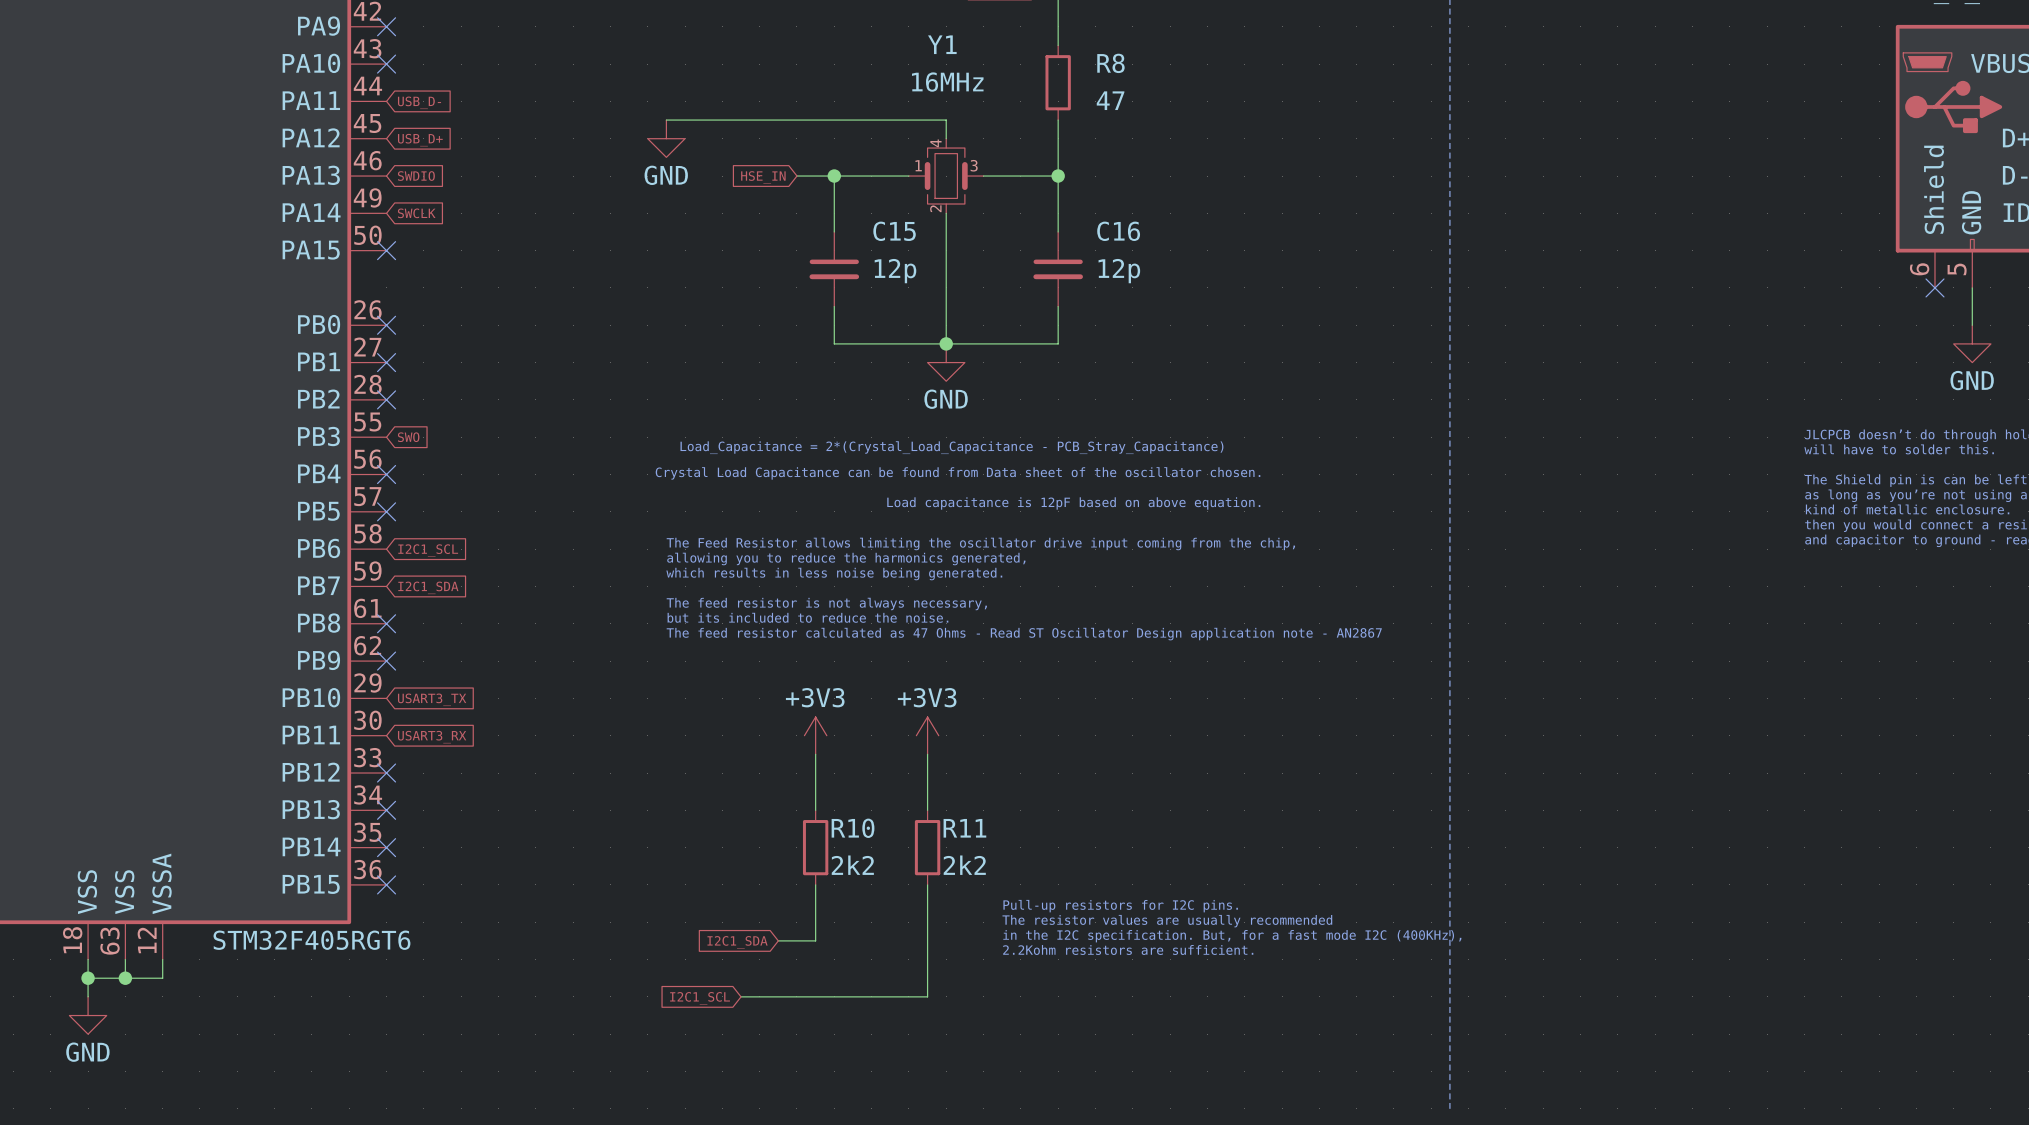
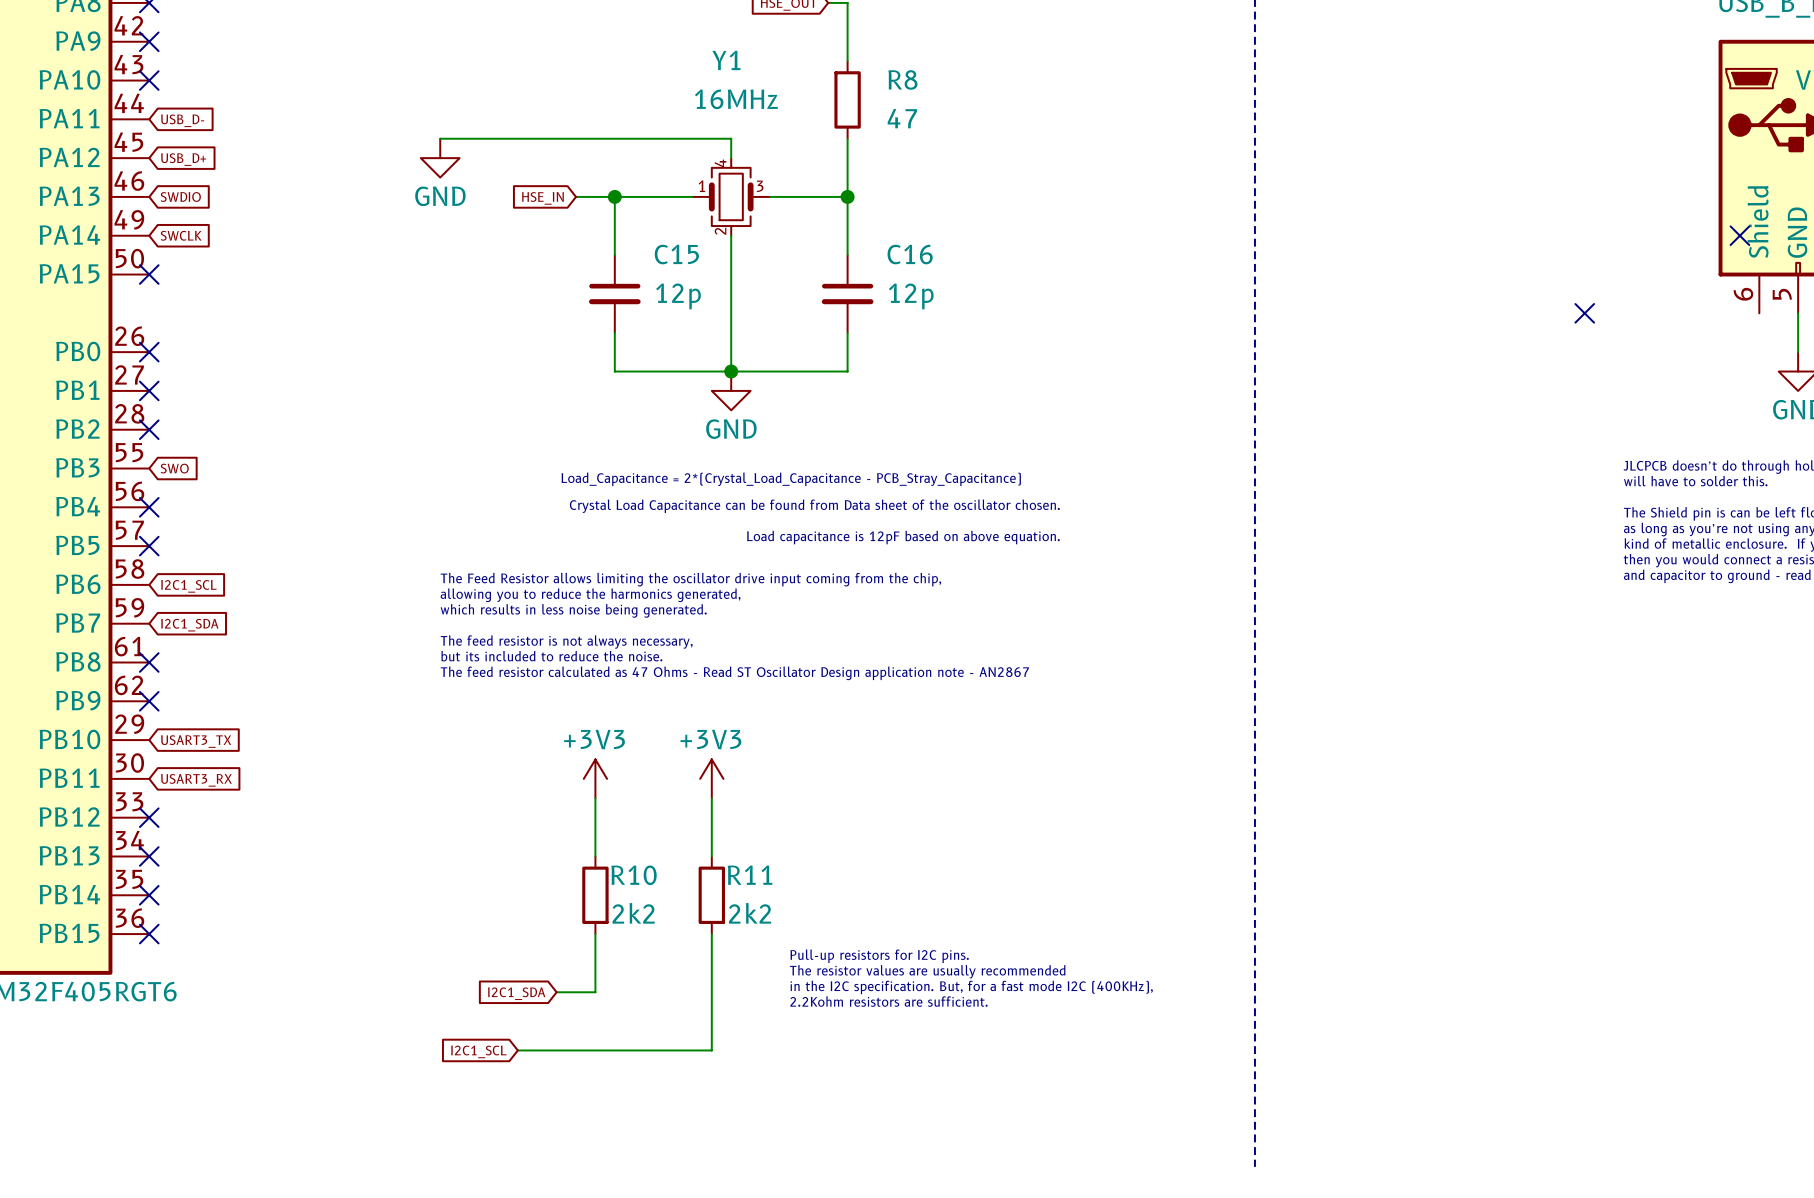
no-connect mark: none -> (1584, 313)
no-connect mark position: (1934, 287) -> (1739, 235)

